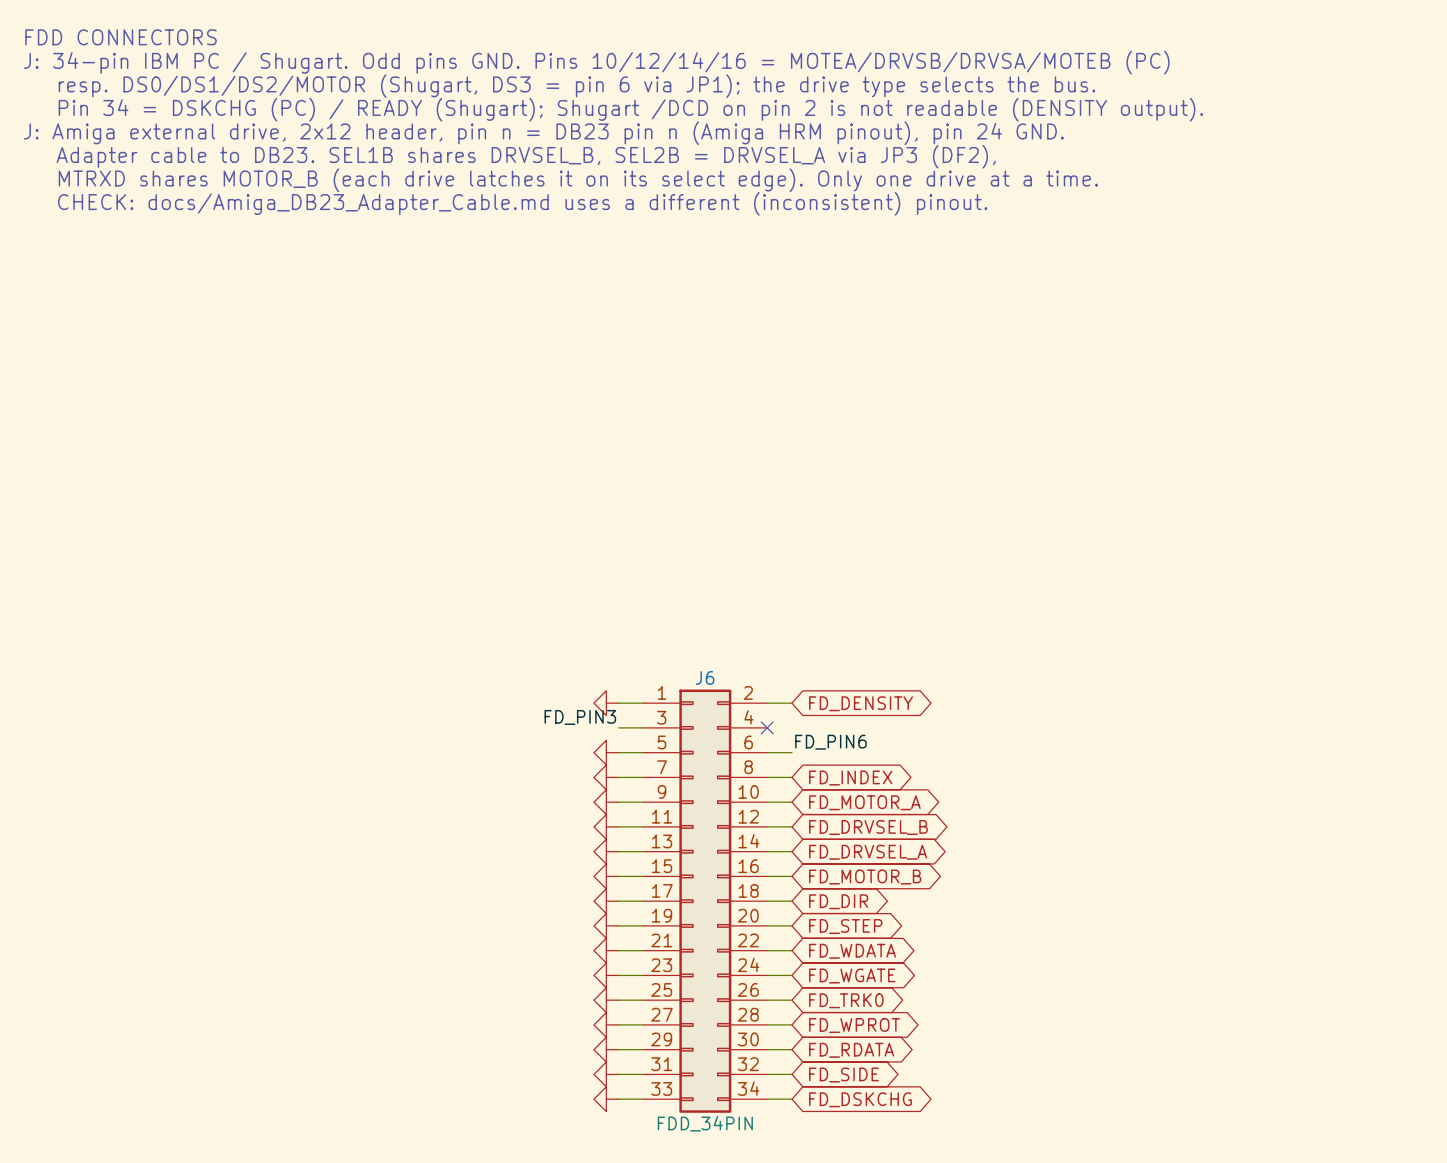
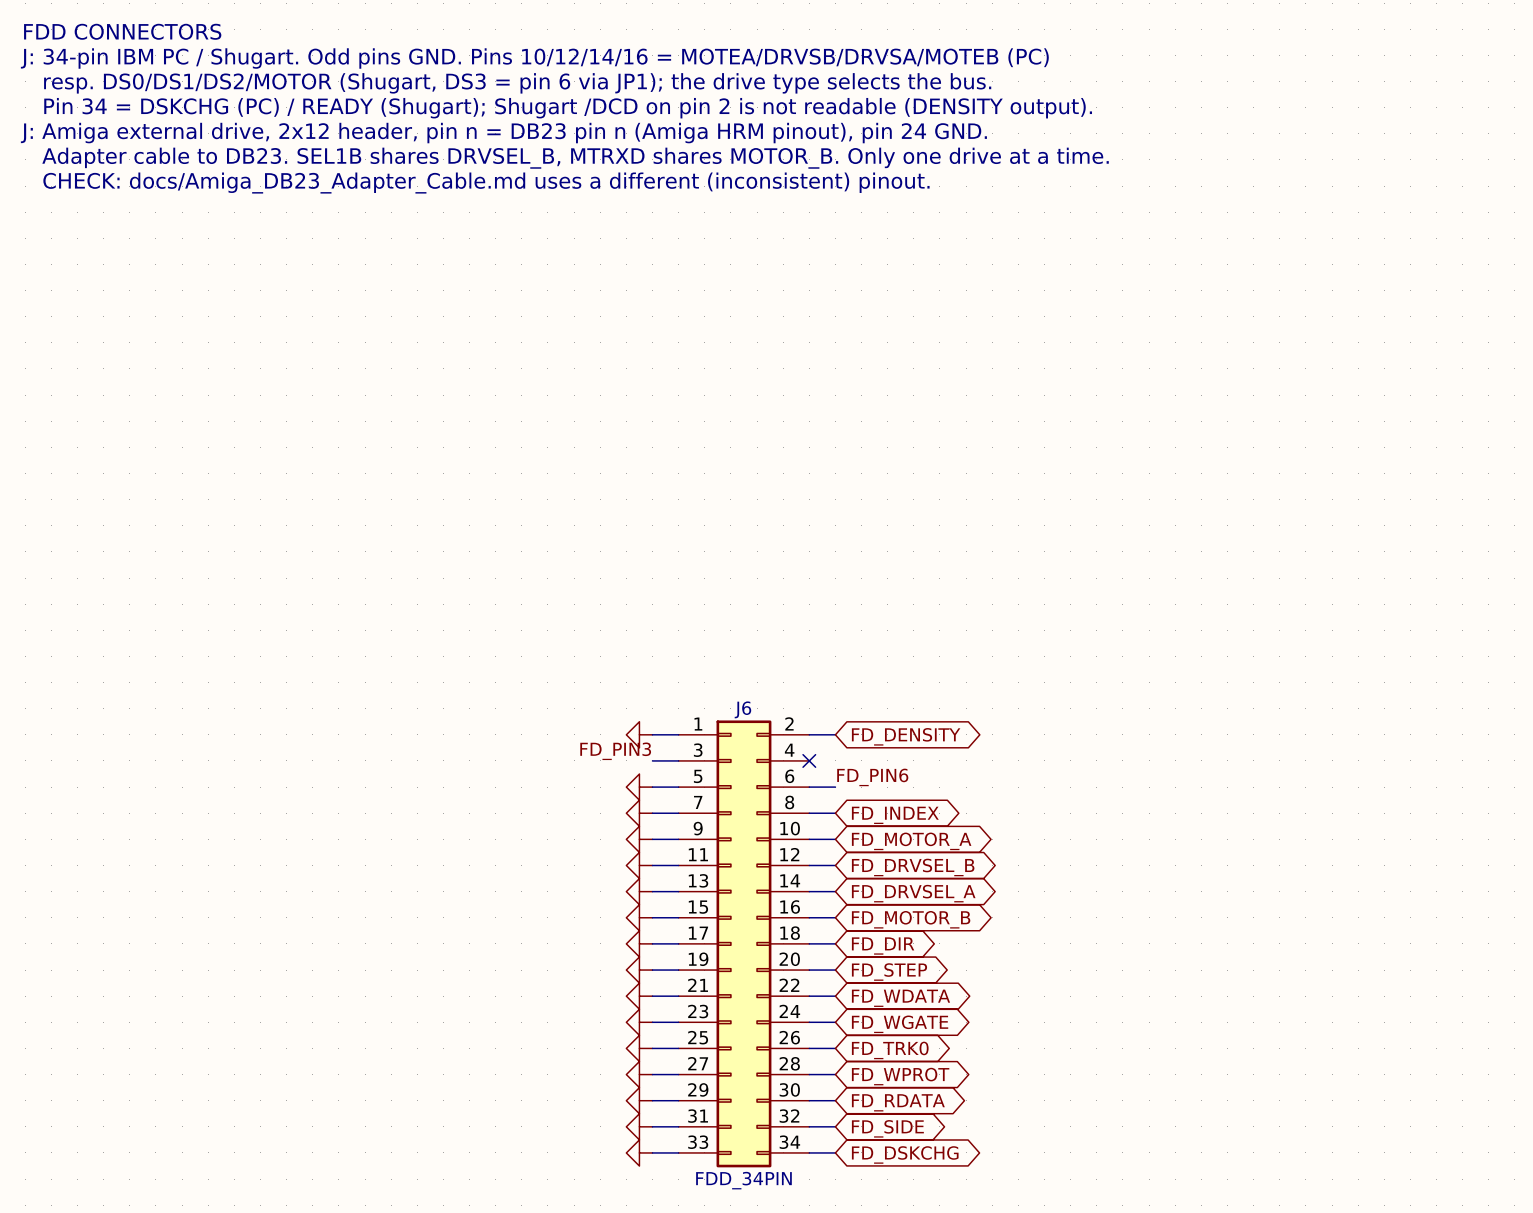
text: Adapter cable to DB23. SEL1B shares DRVSEL_B, SEL2B = DRVSEL_A via JP3 (DF2), (526, 156) -> Adapter cable to DB23. SEL1B shares DRVSEL_B, MTRXD shares MOTOR_B. Only one drive at a time. (575, 158)
text: MTRXD shares MOTOR_B (each drive latches it on its select edge). Only one drive at a time. (578, 180) -> CHECK: docs/Amiga_DB23_Adapter_Cable.md uses a different (inconsistent) pinout. (486, 183)
text: CHECK: docs/Amiga_DB23_Adapter_Cable.md uses a different (inconsistent) pinout. (522, 203) -> none

